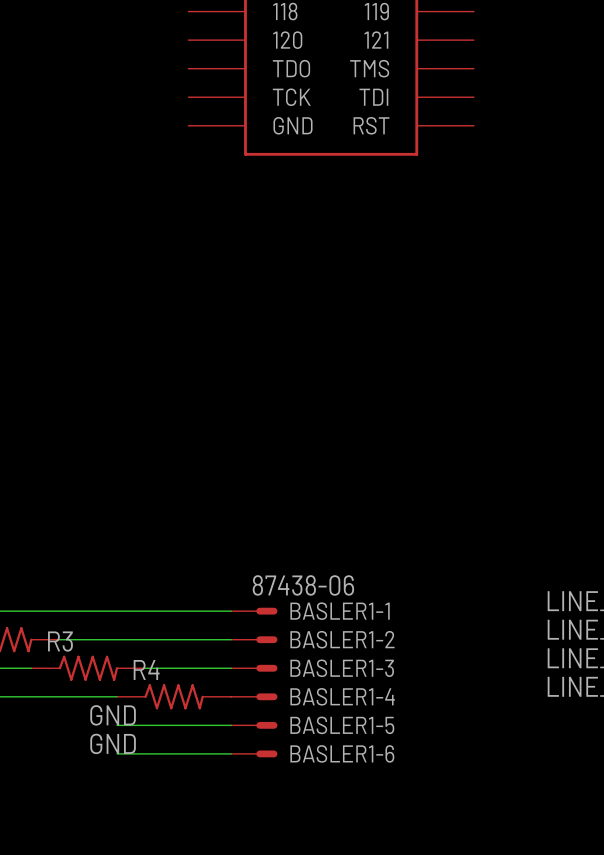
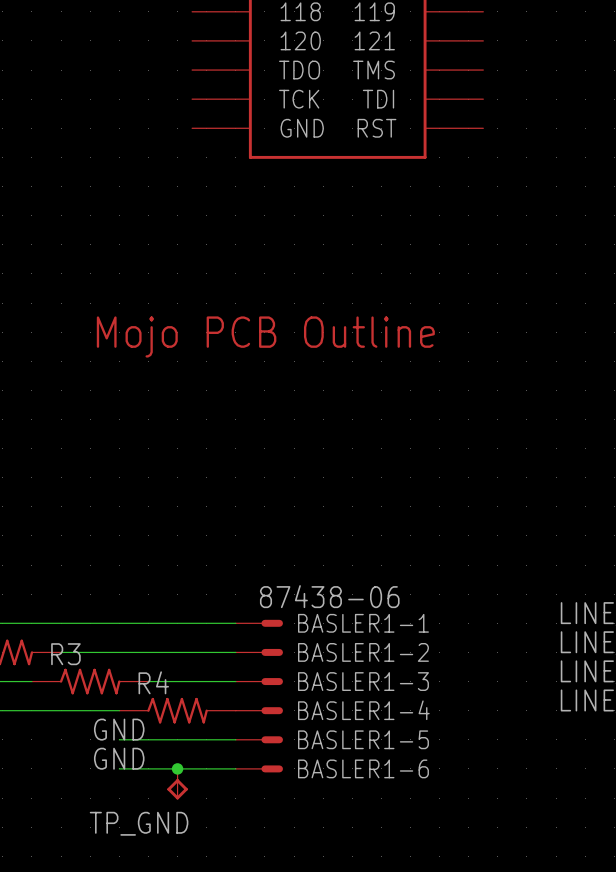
part: none -> (265, 336)
junction: none -> (177, 768)
TP_GND: none -> (177, 784)

